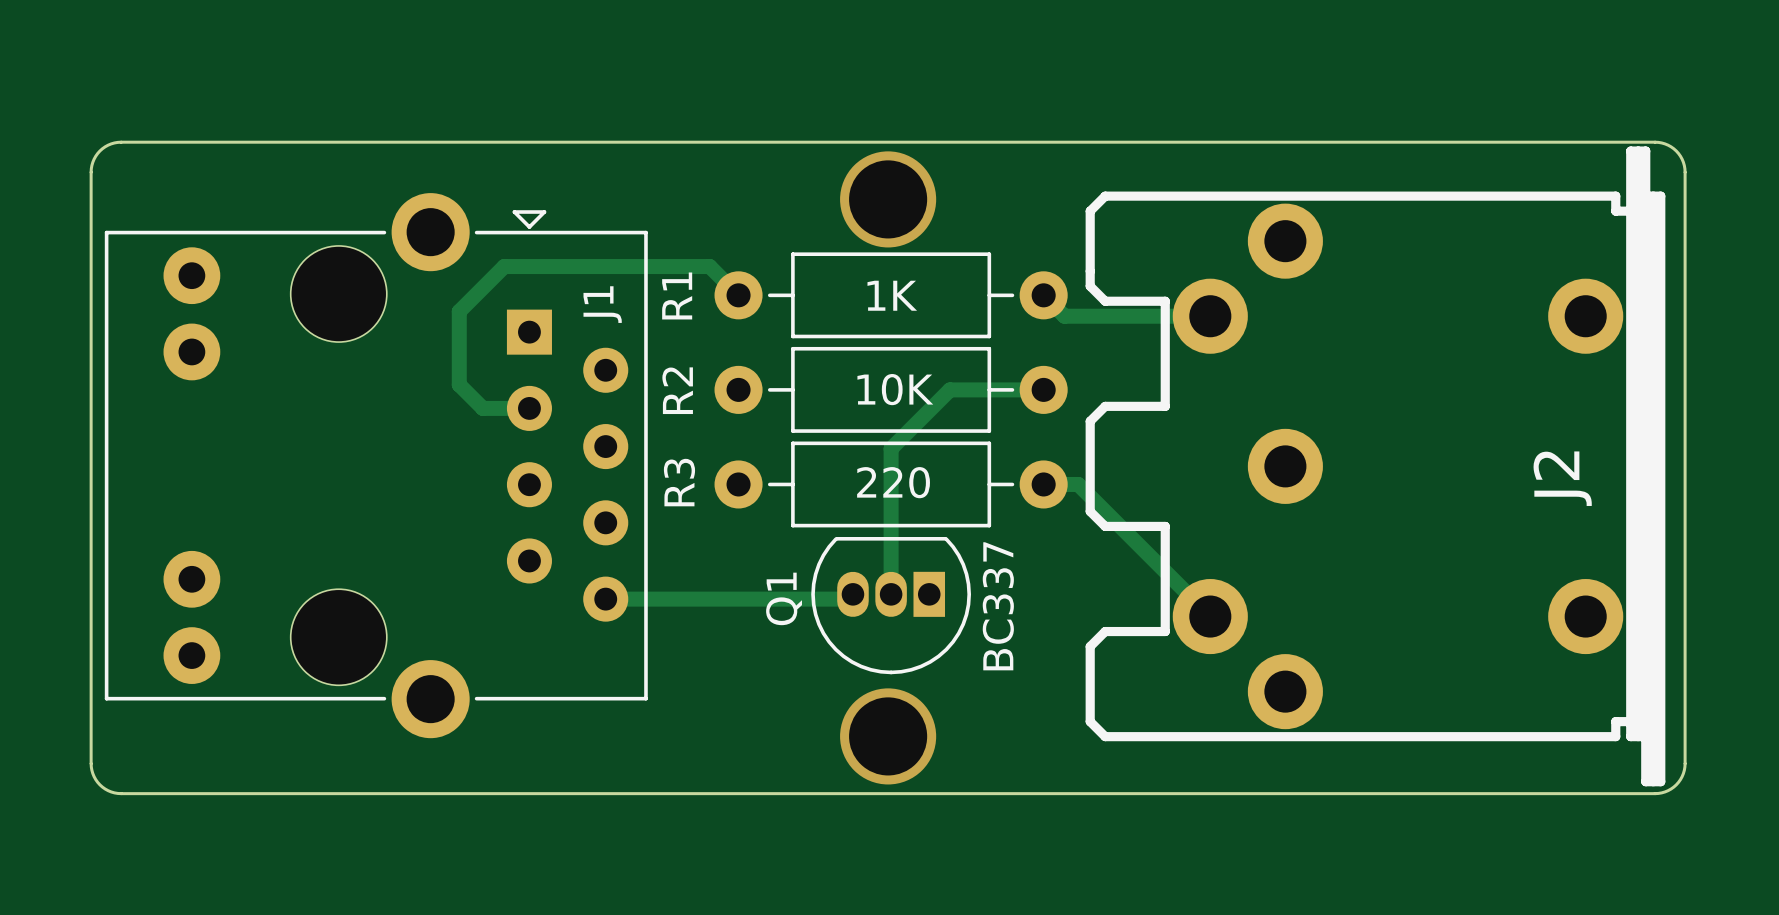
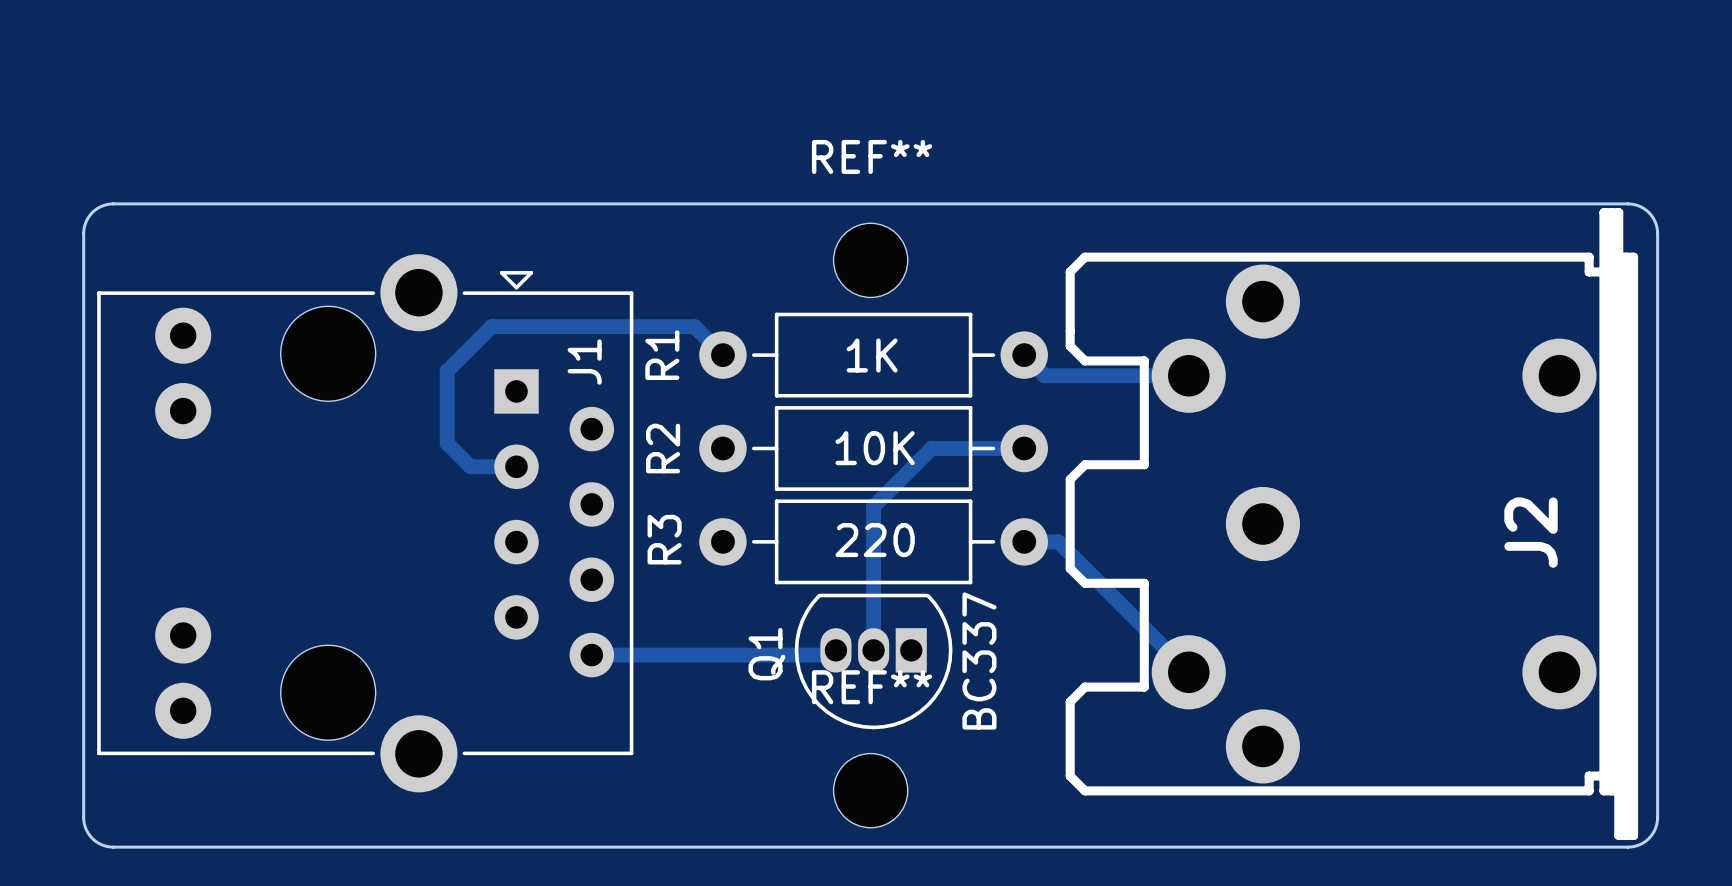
via: (888, 199) -> none
REF**: none -> (870, 260)
via: (888, 736) -> none
REF**: none -> (870, 790)

